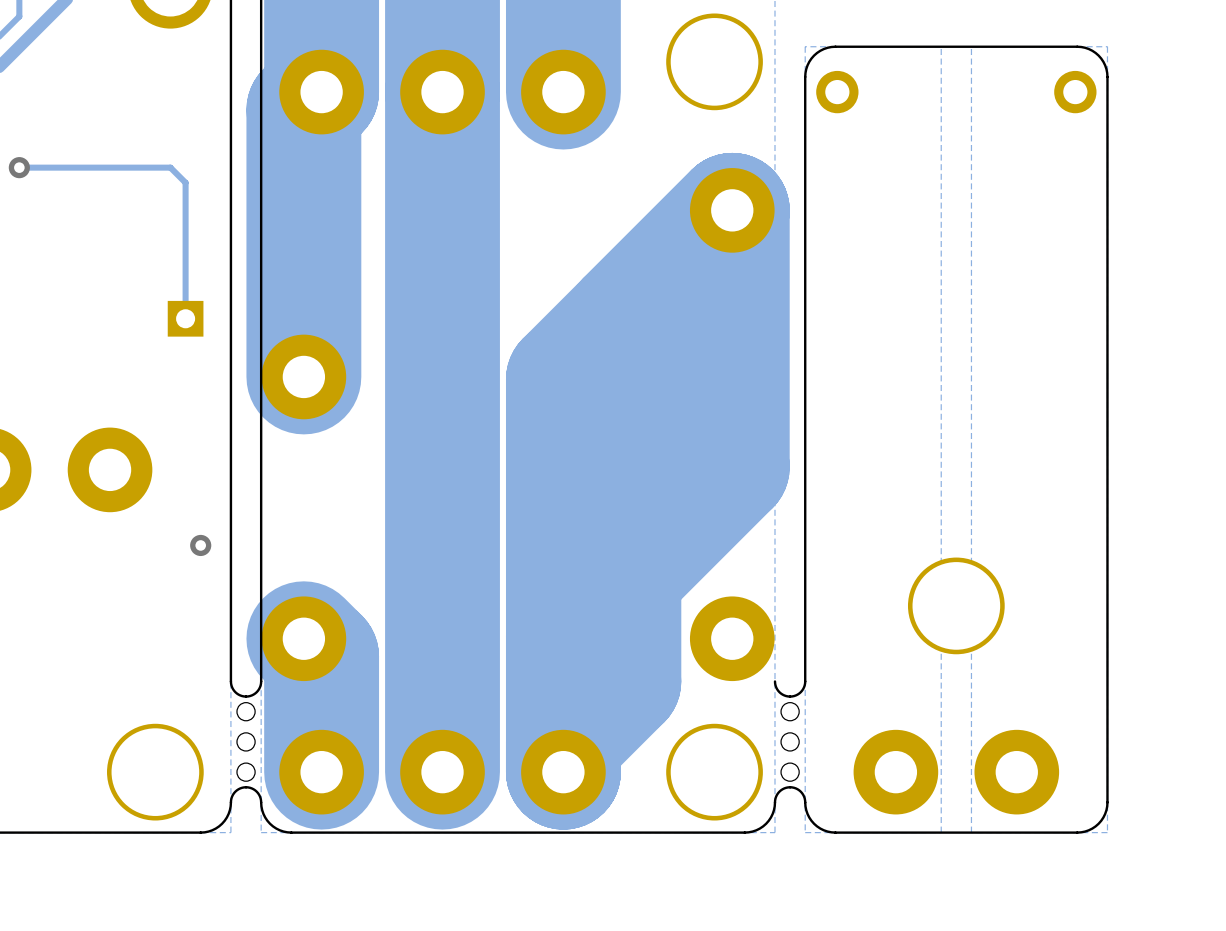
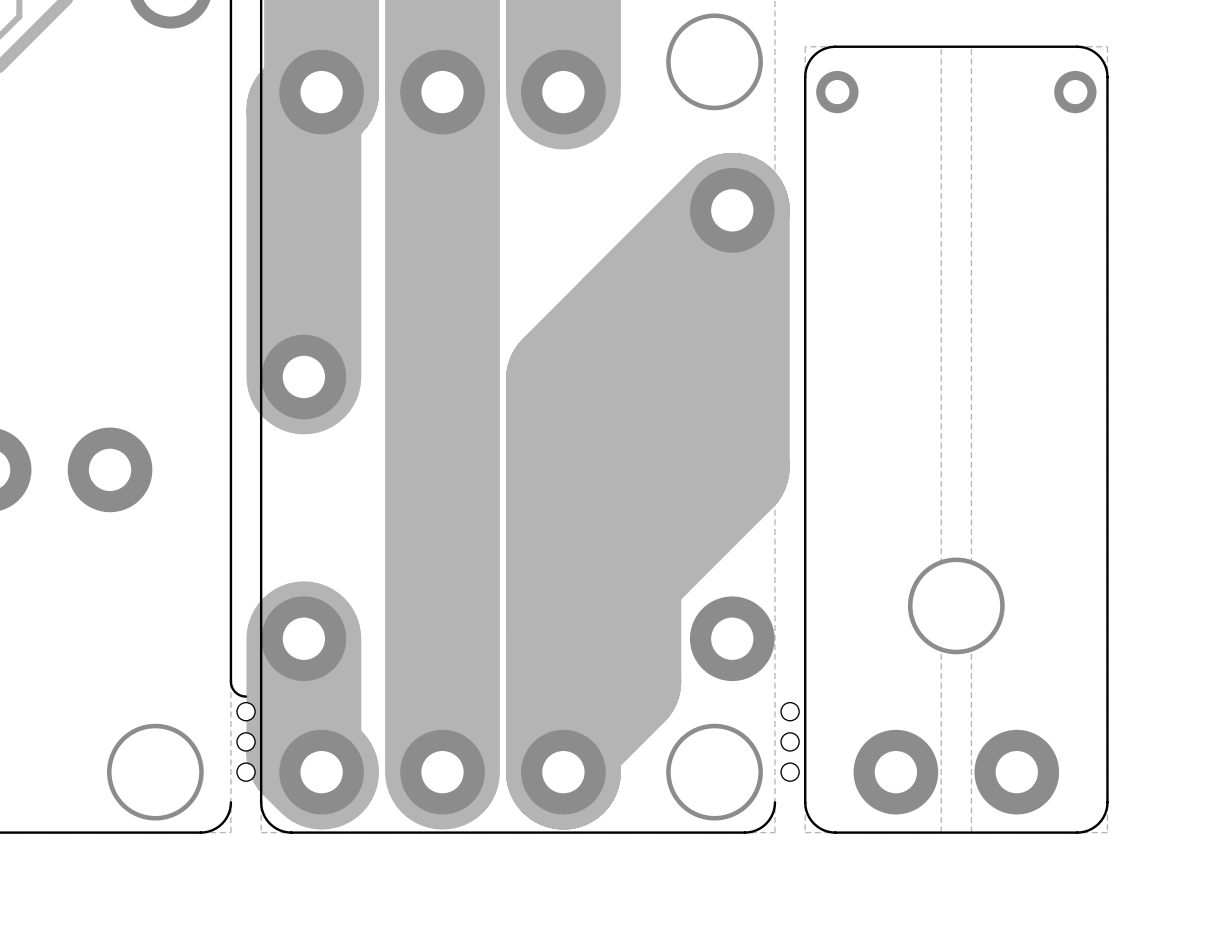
track: (19, 167) (170, 167) (185, 182) (185, 318) -> none
via: (19, 167) -> none
part: (185, 318) -> none
via: (200, 545) -> none
track: (303, 638) (321, 656) (321, 772) -> (303, 638) (303, 754) (321, 772)
board edge: (261, 681) (256, 692) (246, 696) -> (261, 681) (261, 802)
board edge: (774, 681) (779, 692) (790, 696) -> none
board edge: (805, 681) (800, 692) (790, 696) -> (805, 681) (805, 802)
board edge: (261, 802) (256, 791) (246, 787) (235, 791) (230, 802) -> none
board edge: (805, 802) (800, 791) (790, 787) (779, 791) (774, 802) -> none

